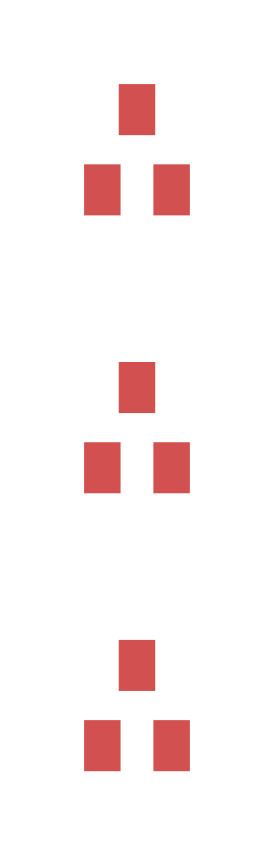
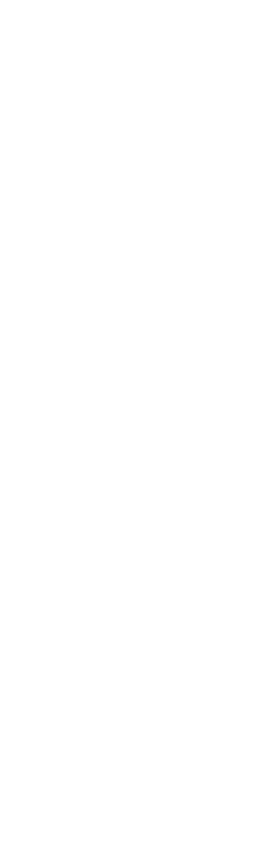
part: (136, 149) -> none
part: (136, 427) -> none
part: (136, 705) -> none

